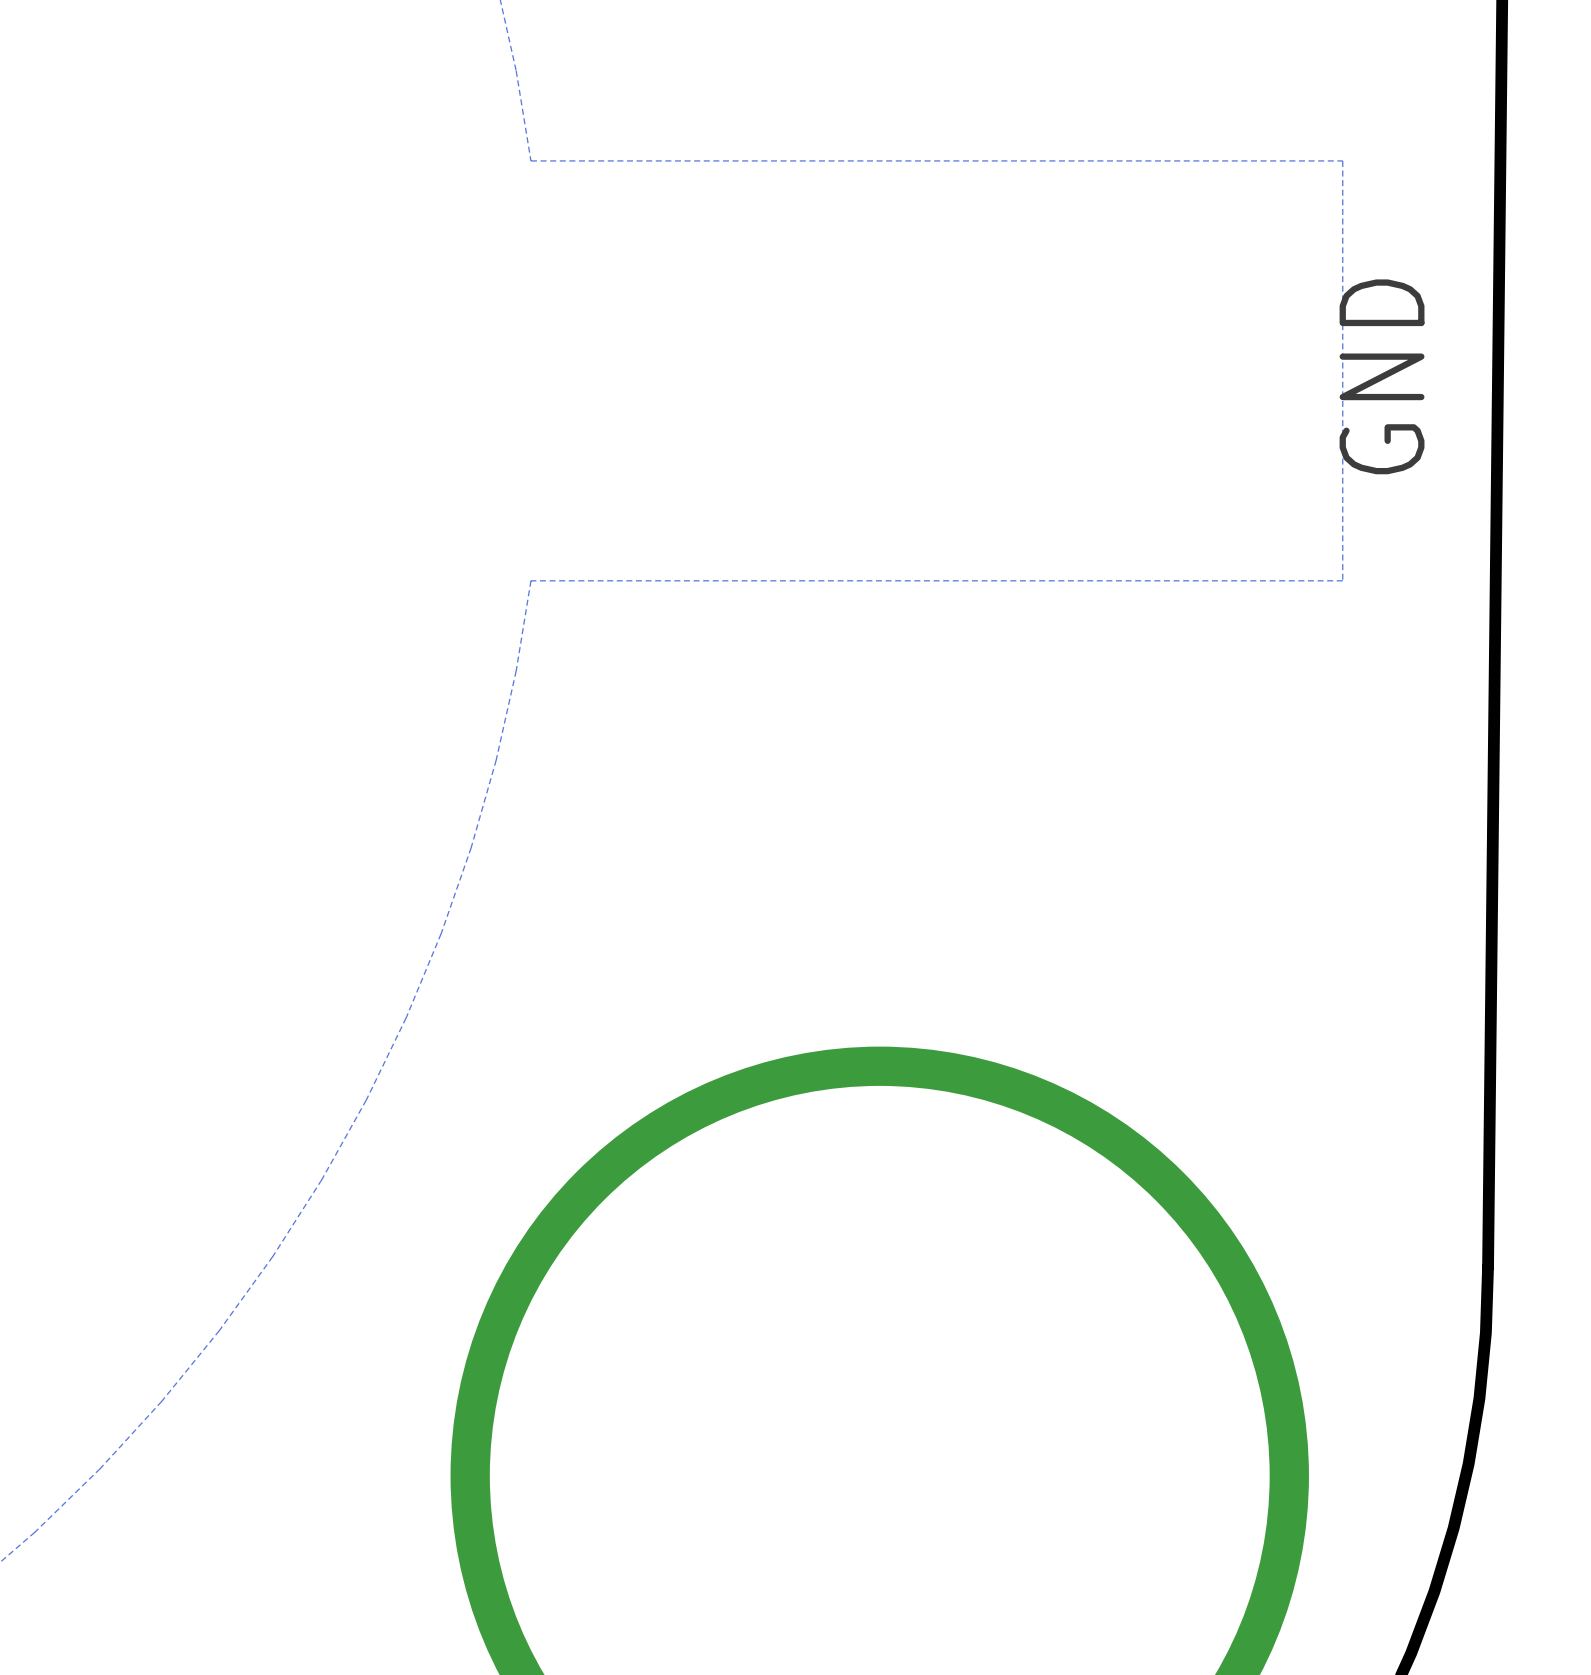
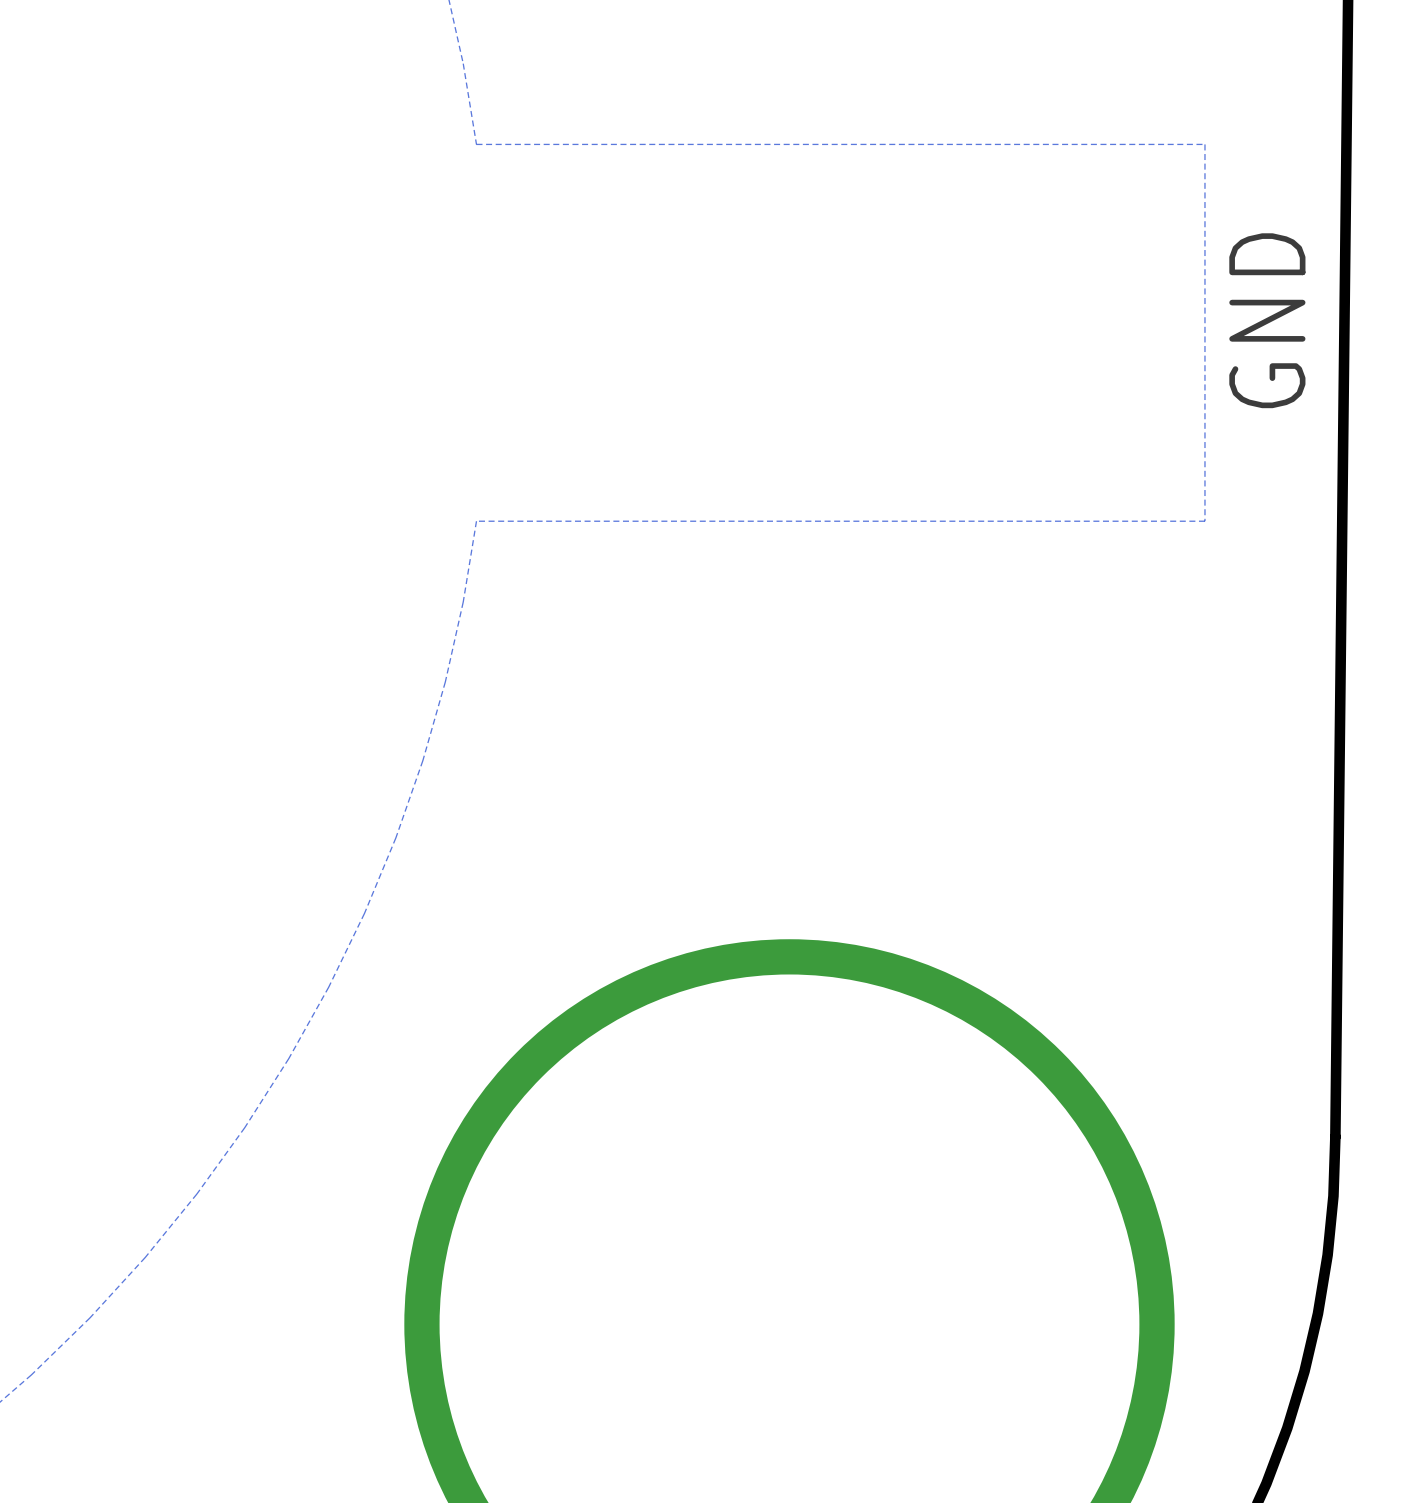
text position: GND (1382, 376) -> GND (1267, 320)

